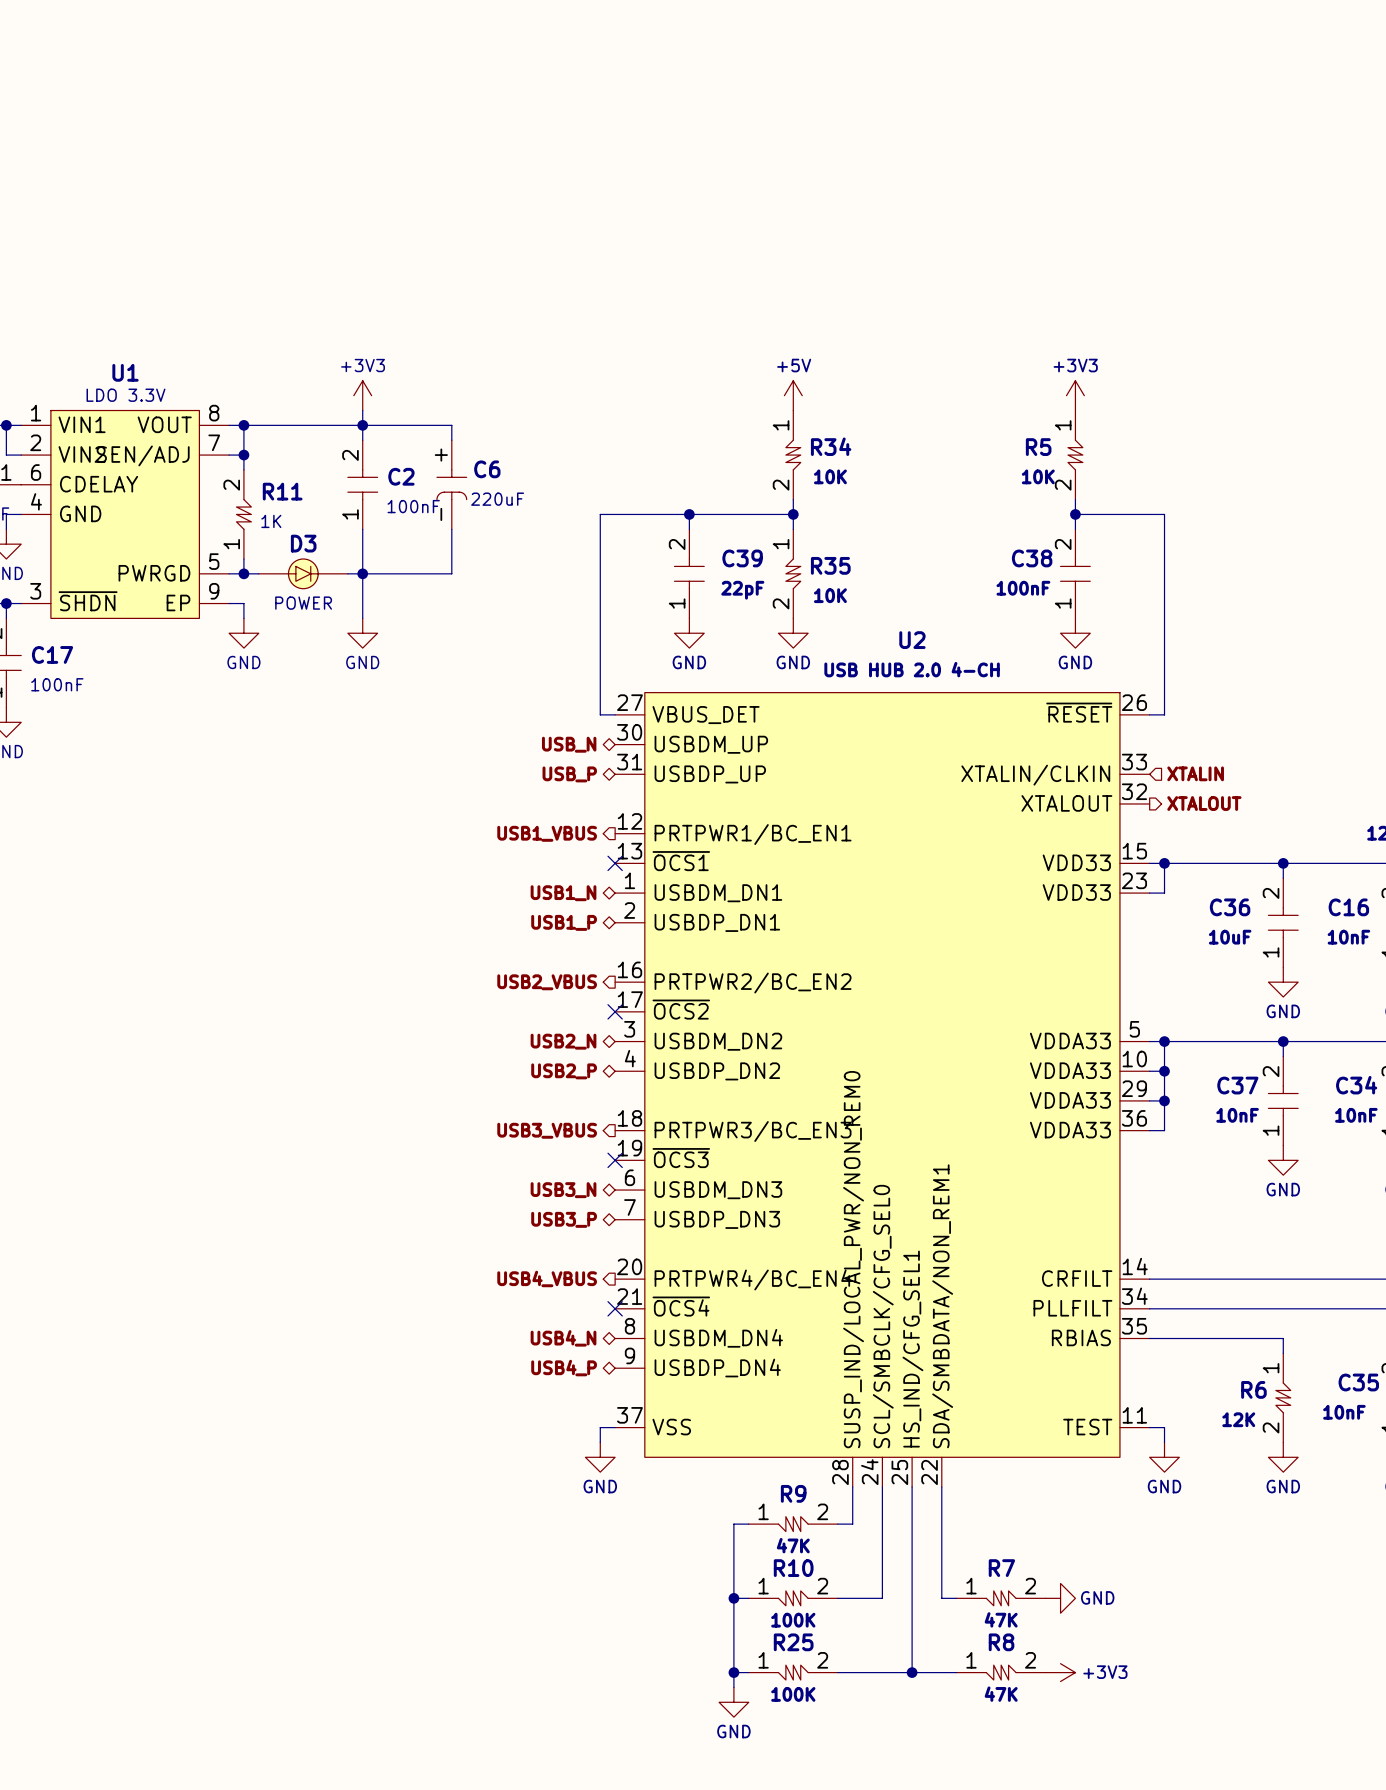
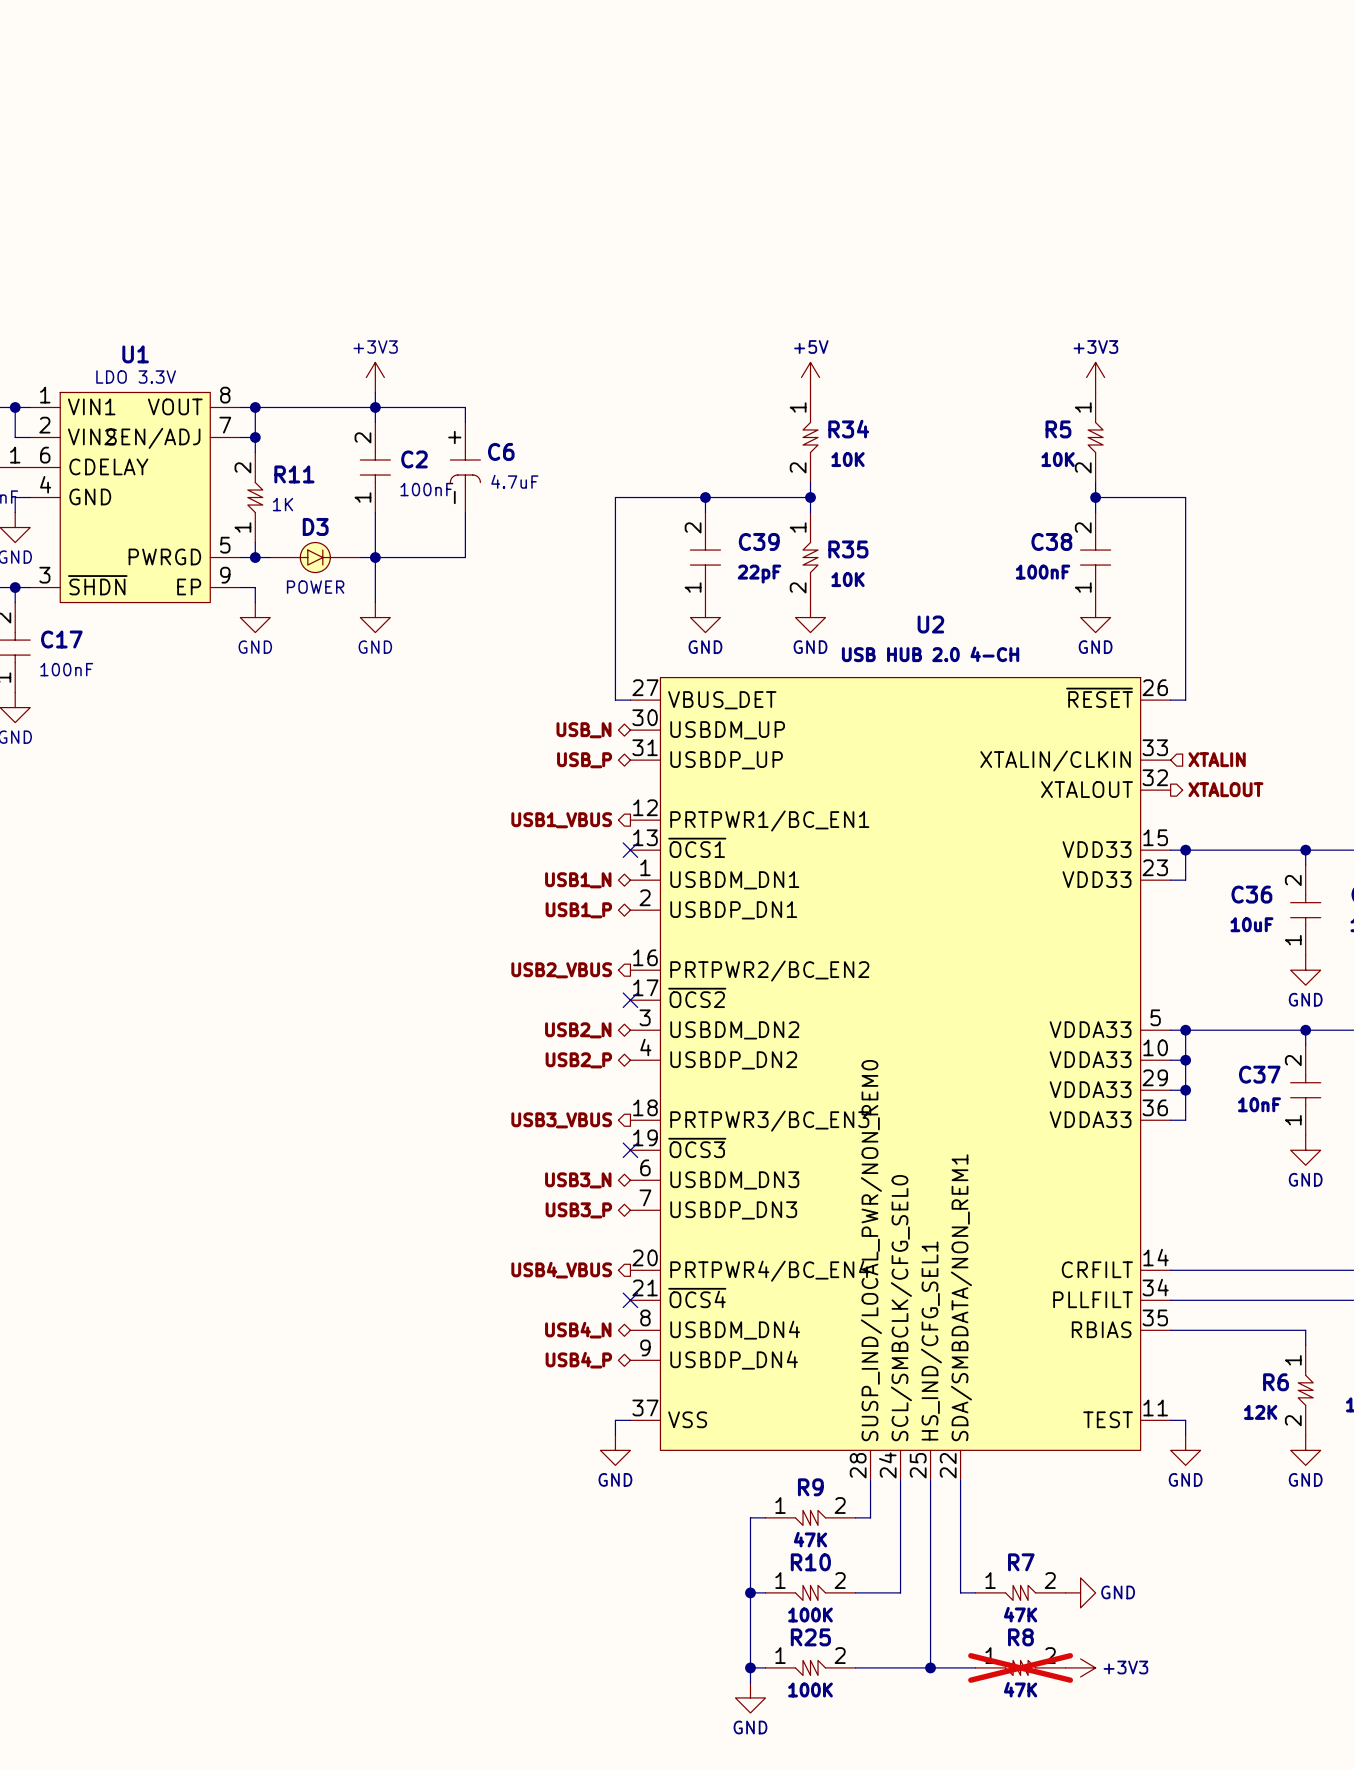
C6 value: 220uF (497, 499) -> 4.7uF (514, 481)
R8 do-not-place cross: none -> (1020, 1667)

